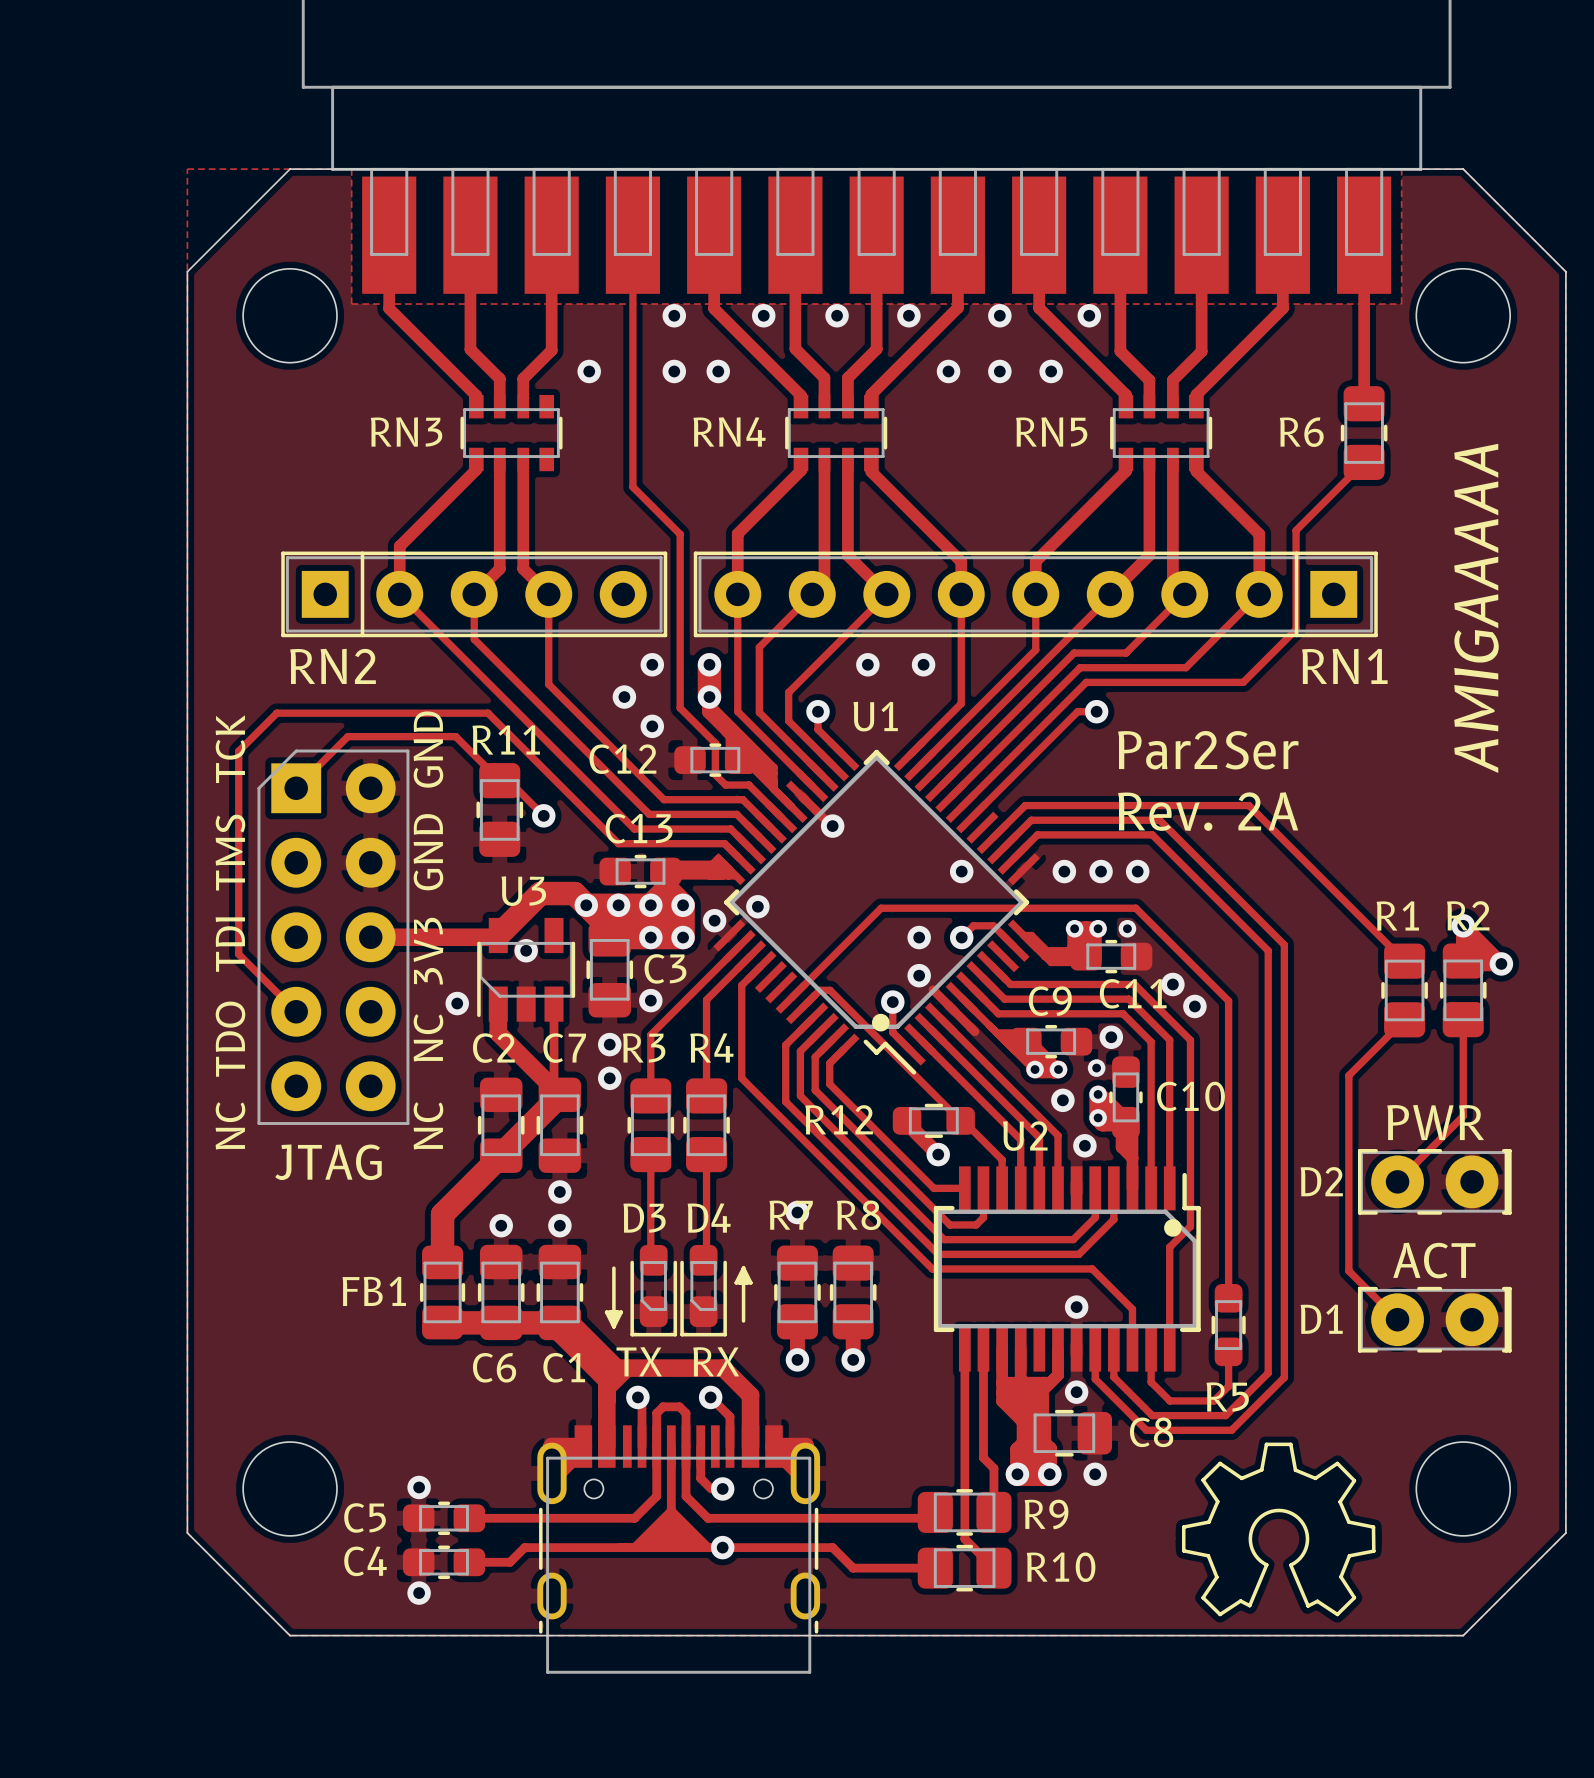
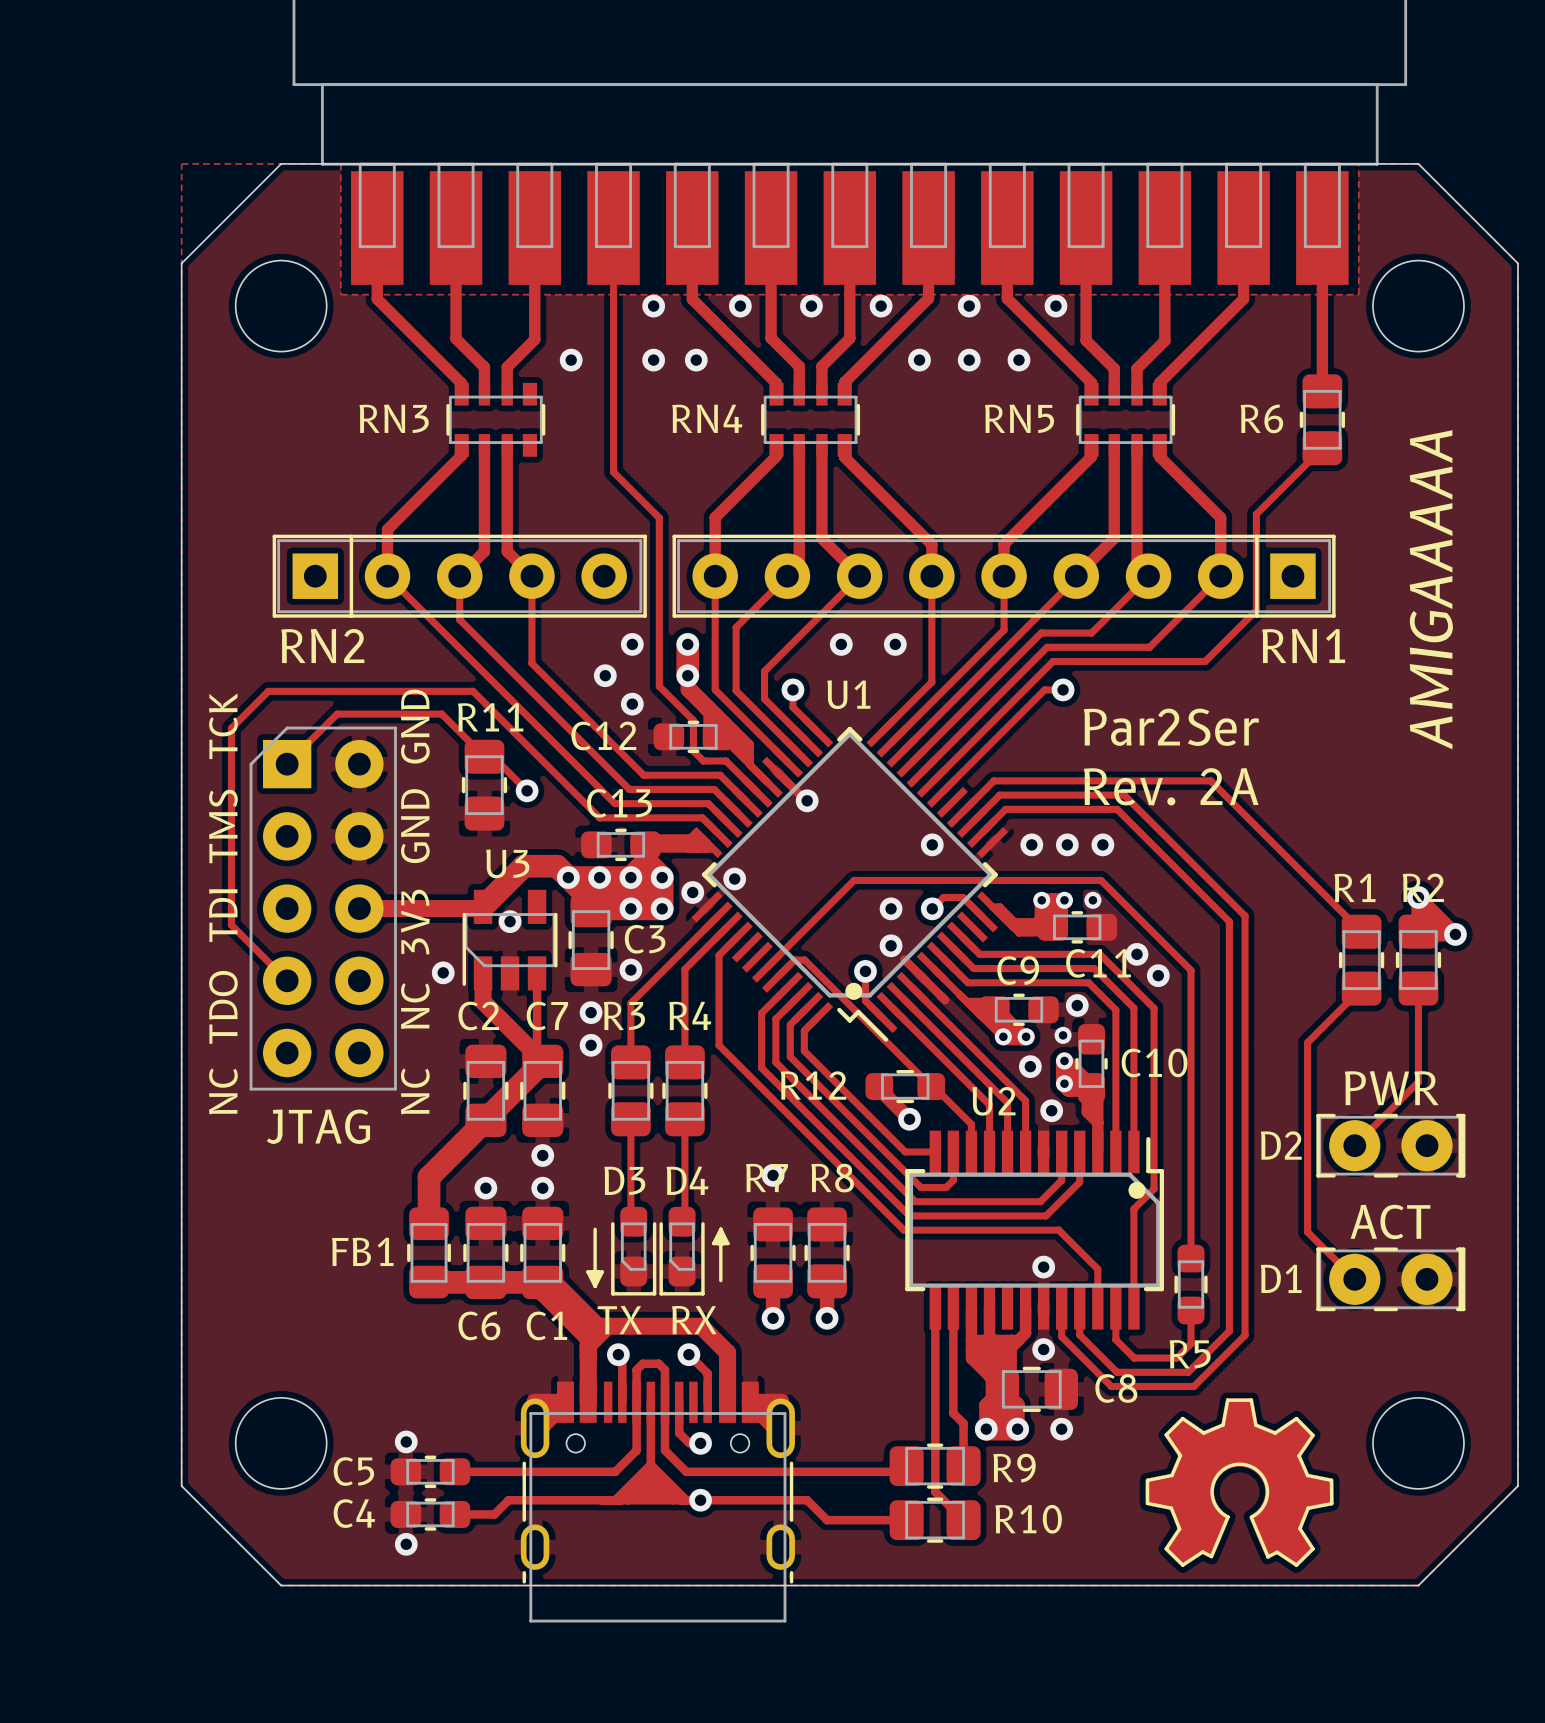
drawing: none -> [1145, 1398, 1334, 1568]

